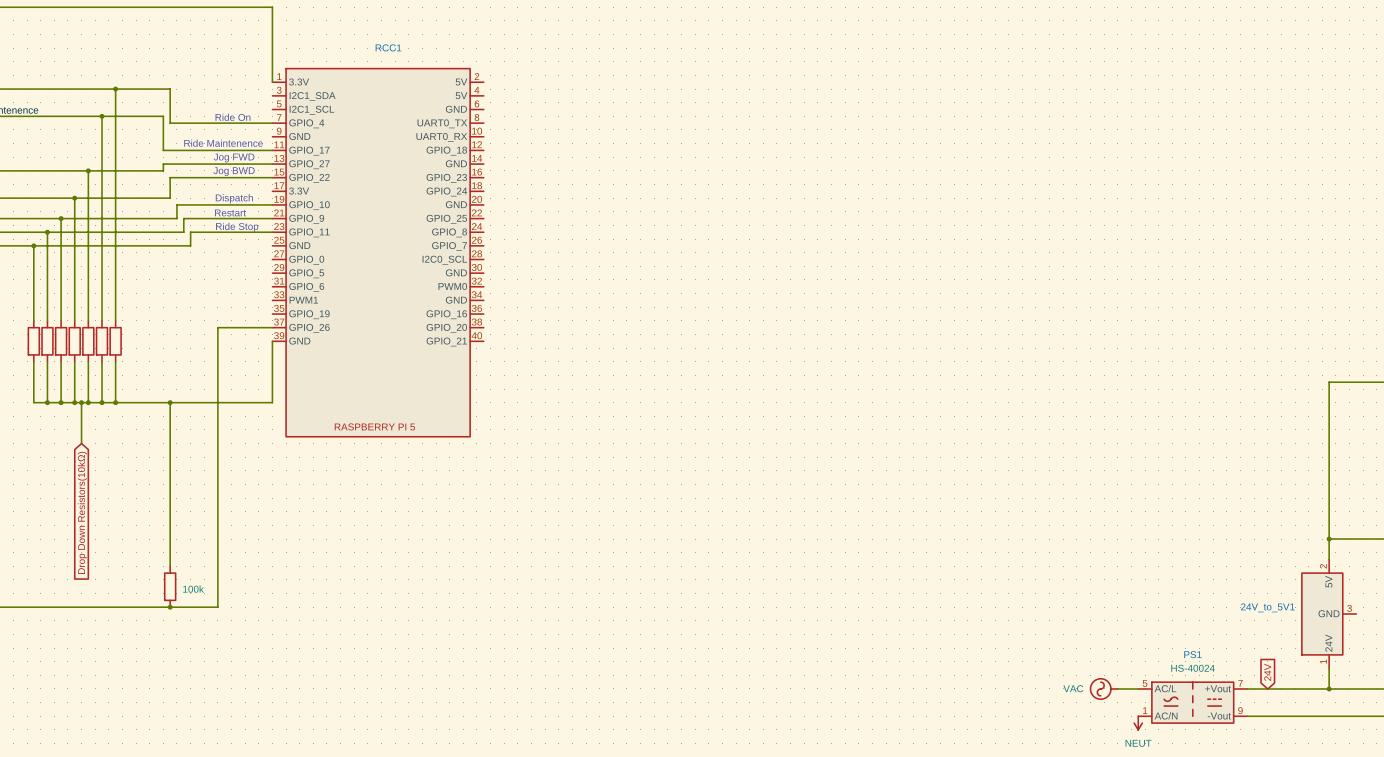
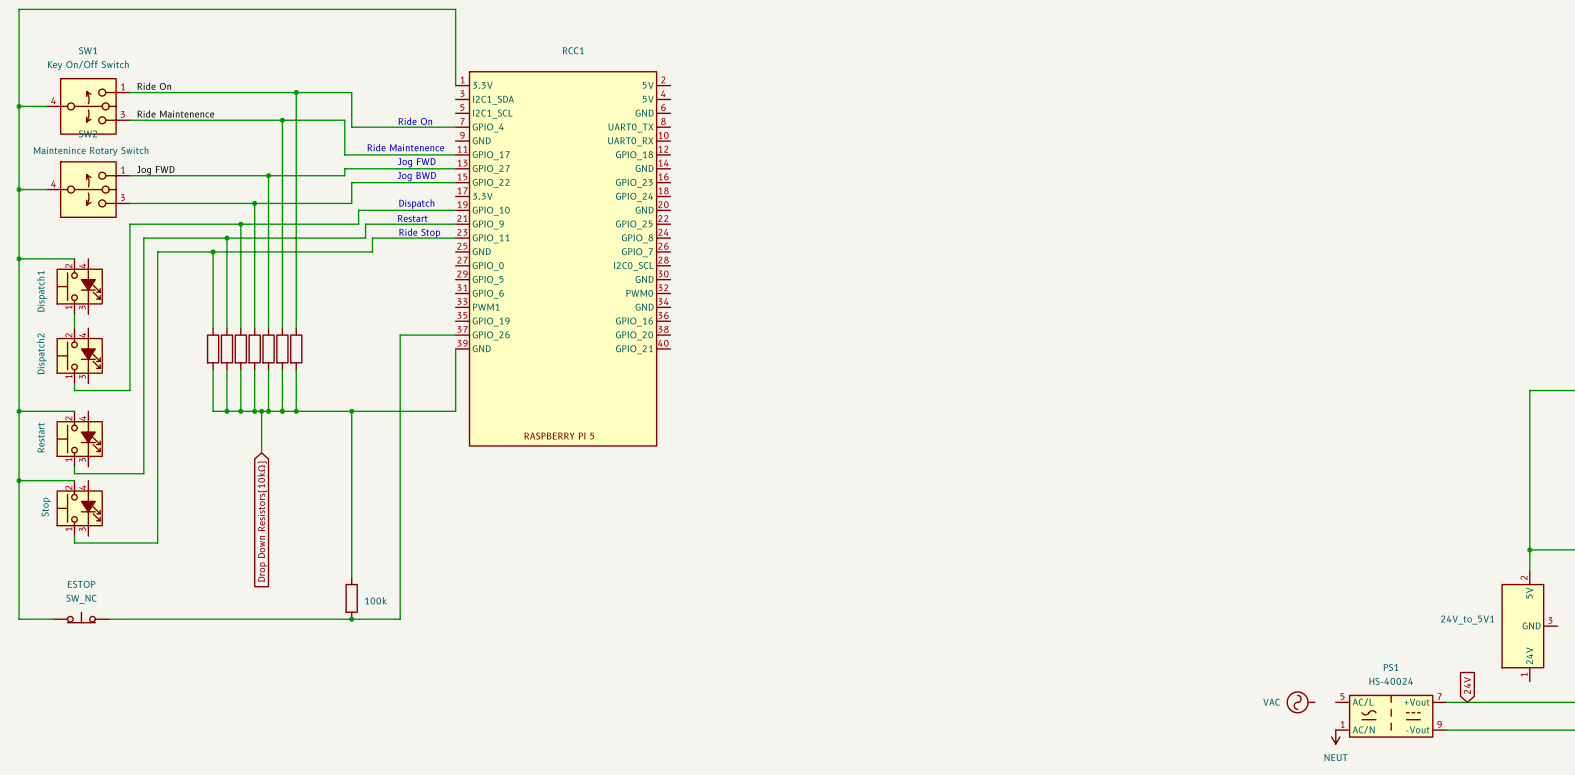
wire: (1329, 668) (1329, 688) -> none
wire: (1117, 688) (1138, 688) -> none
junction: (1329, 688) -> none

